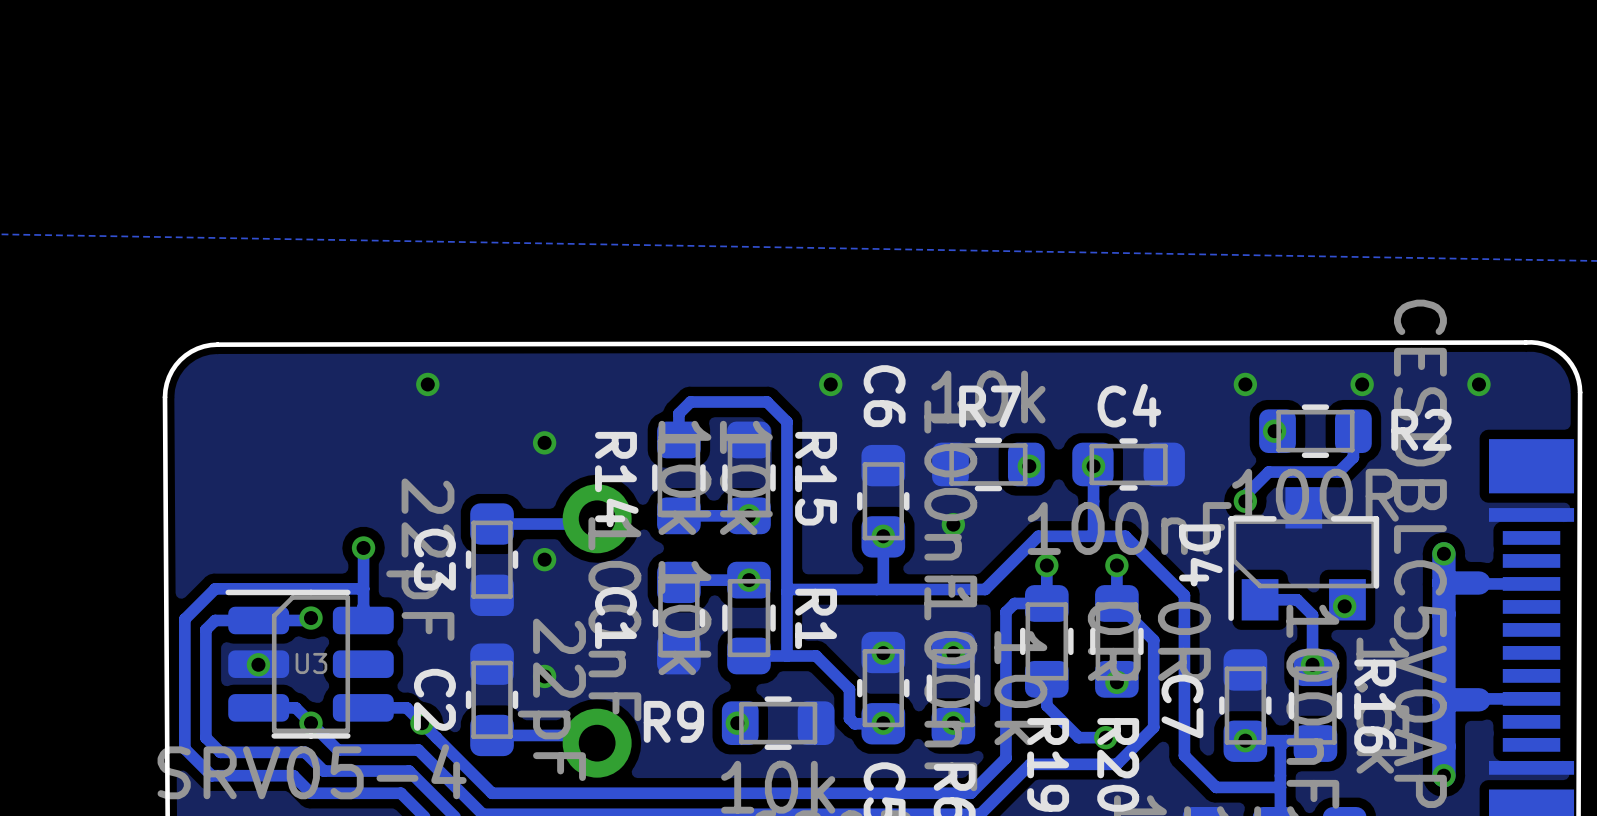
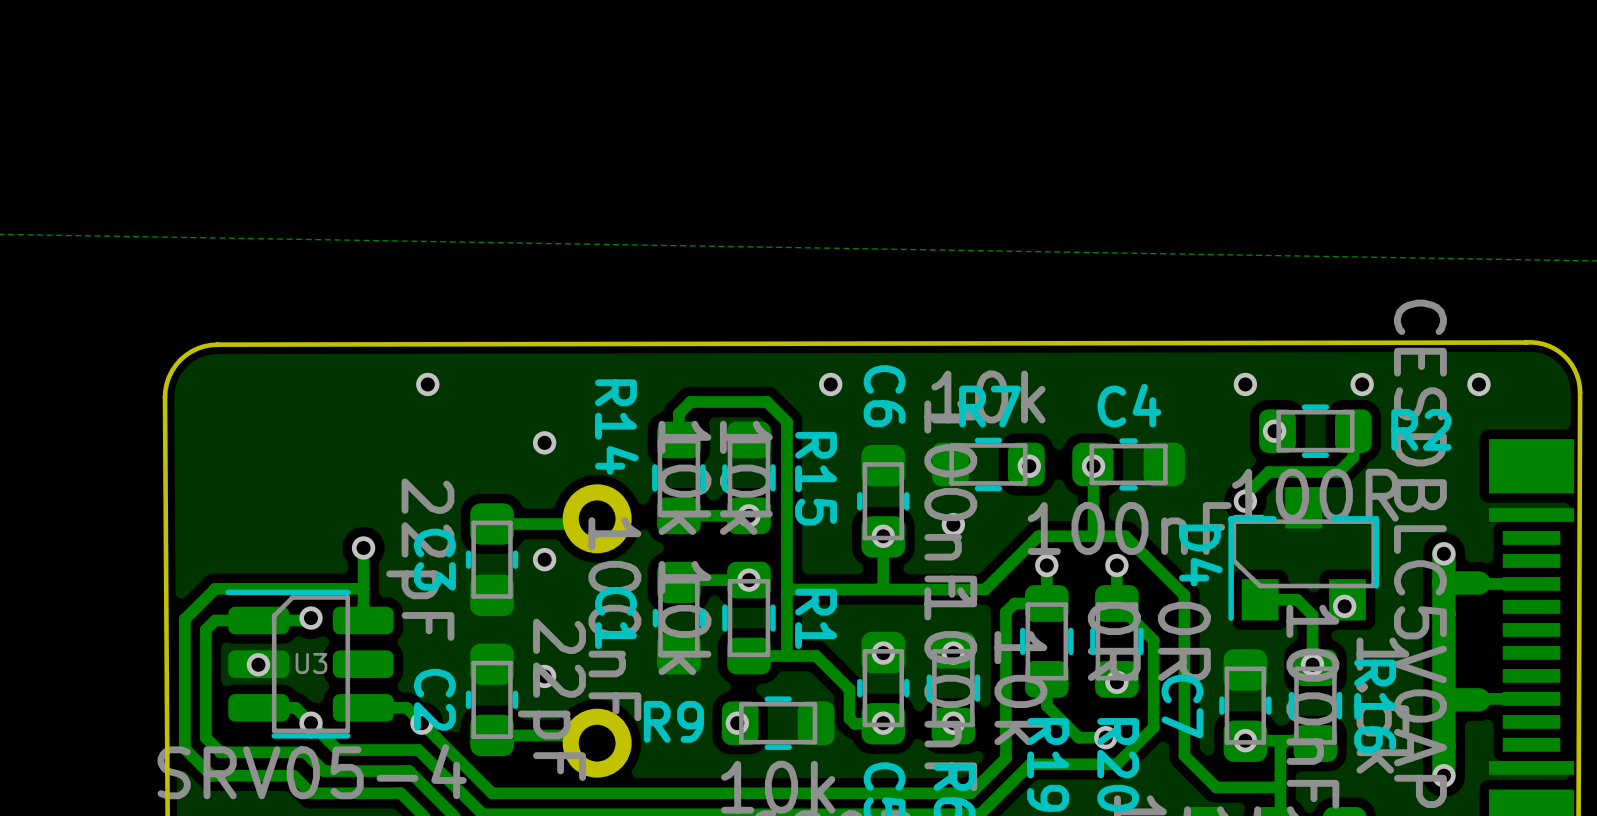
R14 name position: R14 (616, 479) -> R14 (616, 427)

